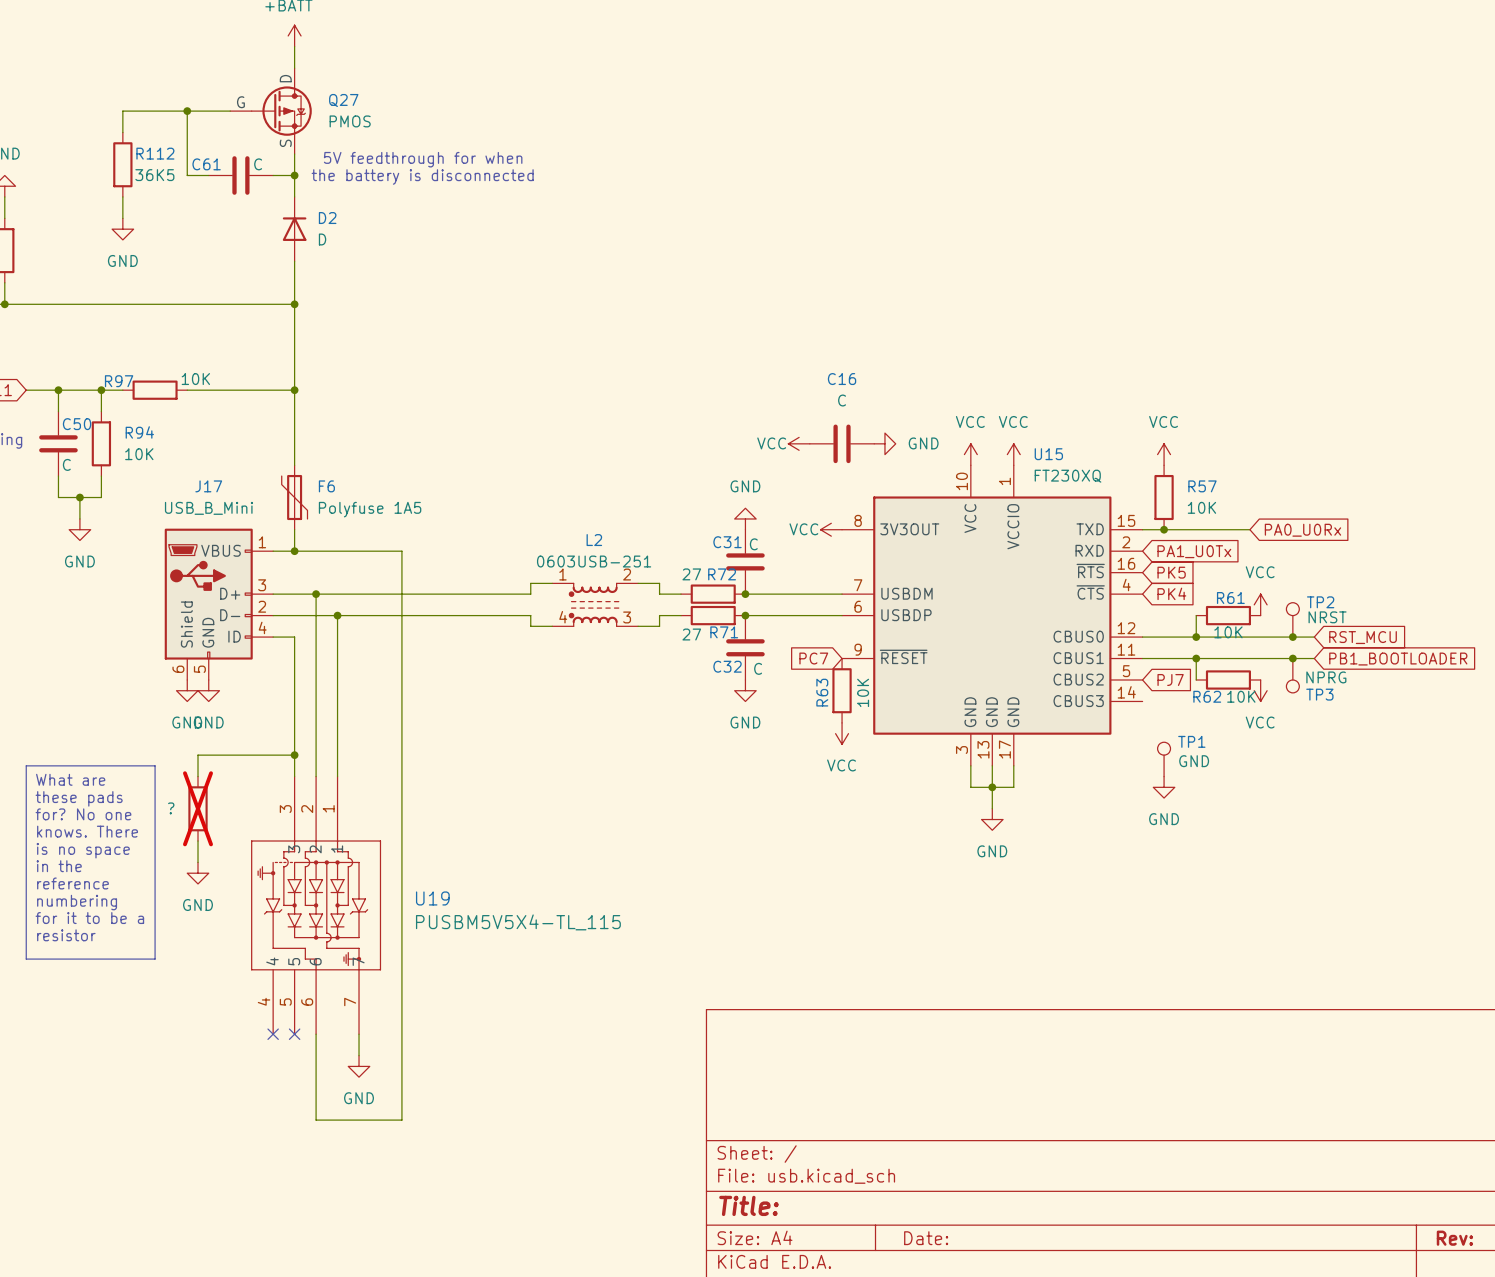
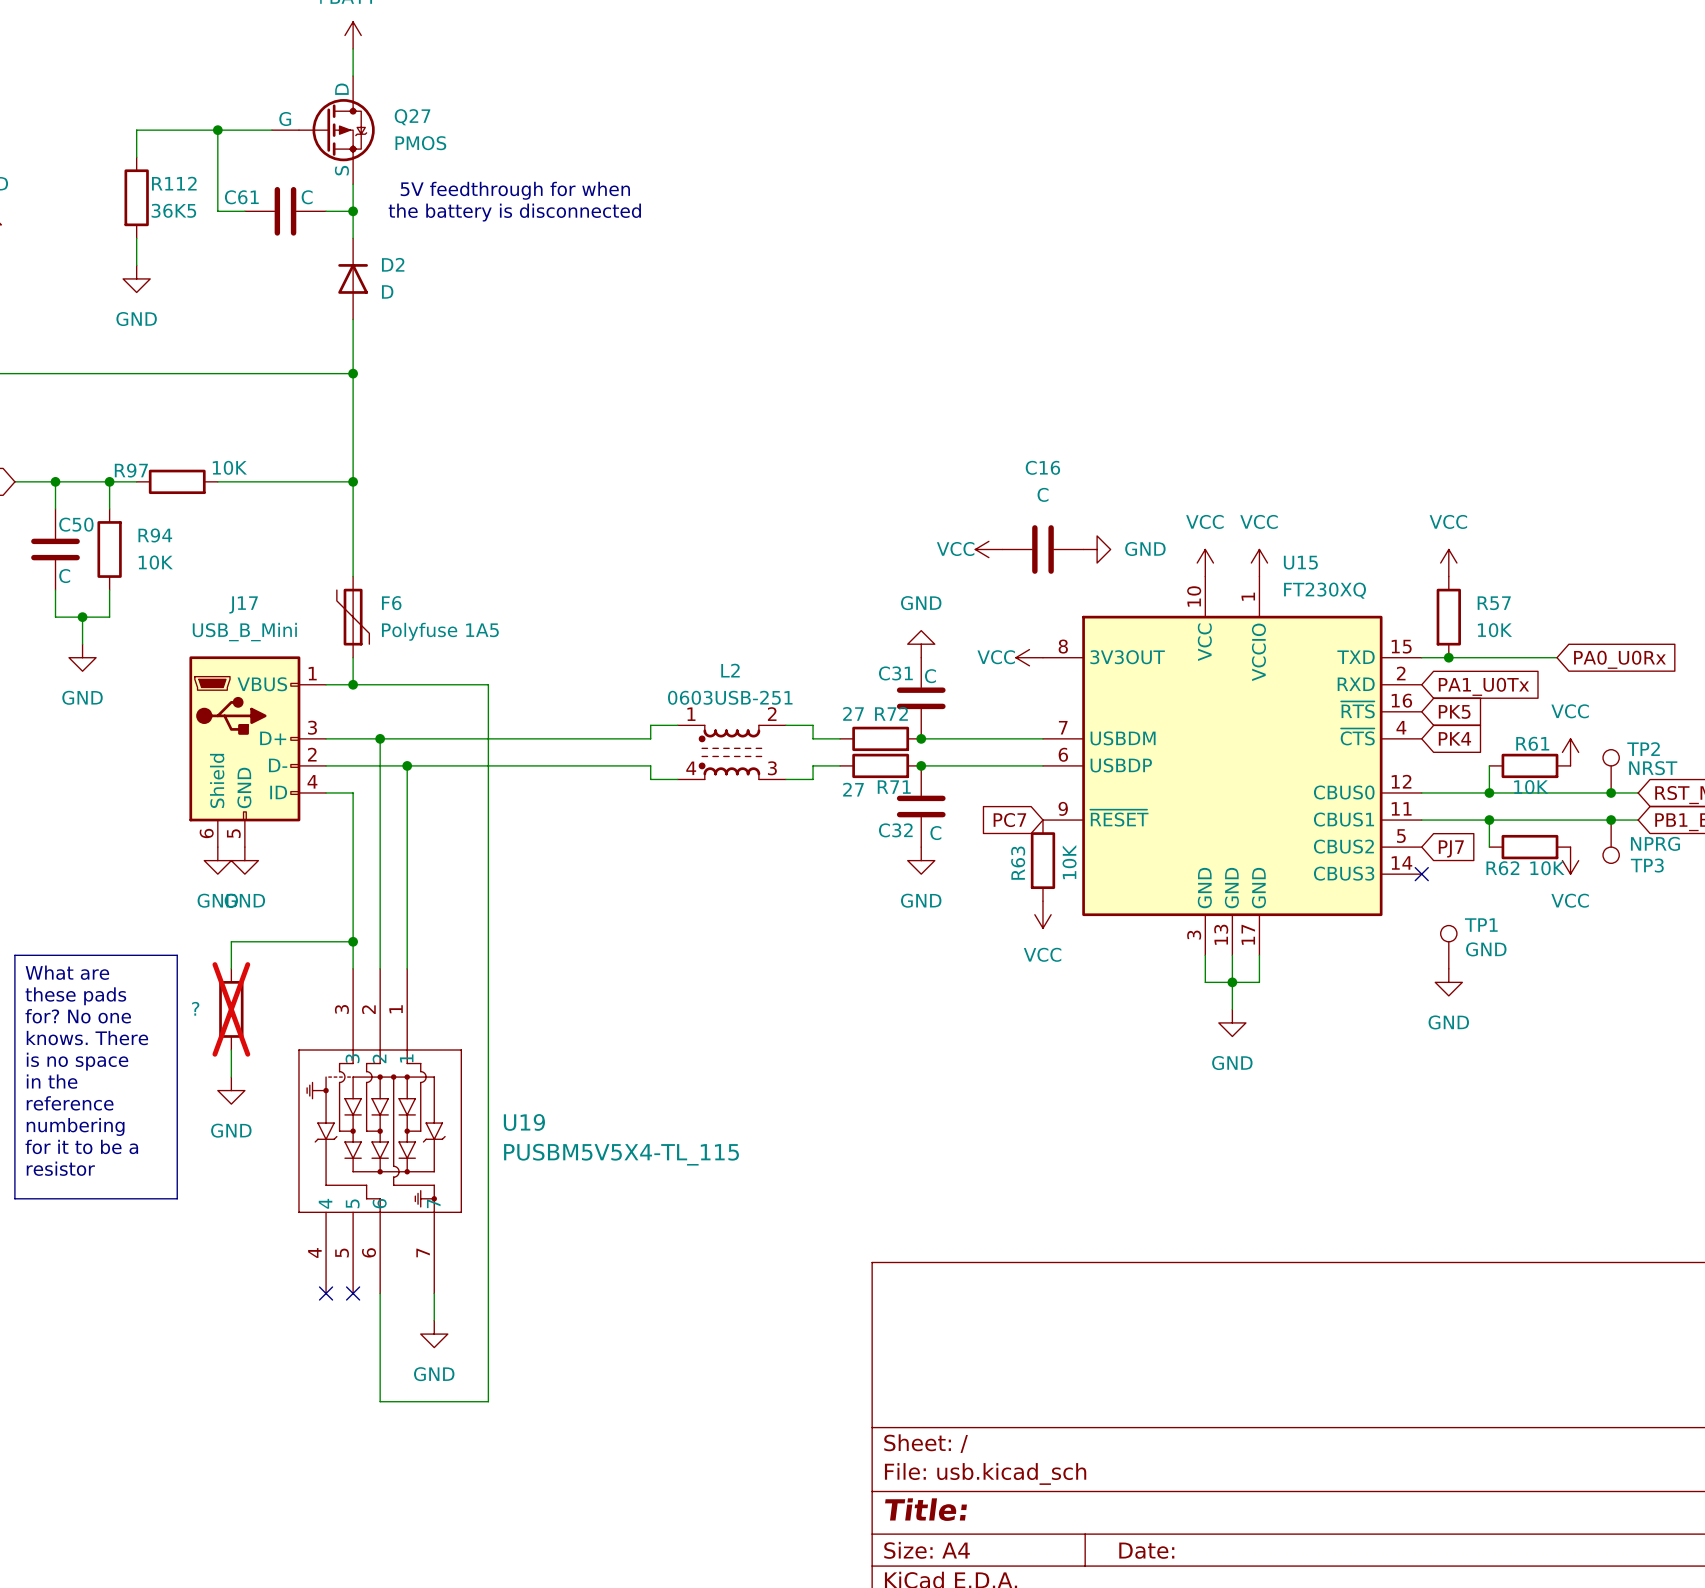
no-connect mark: none -> (1421, 874)

